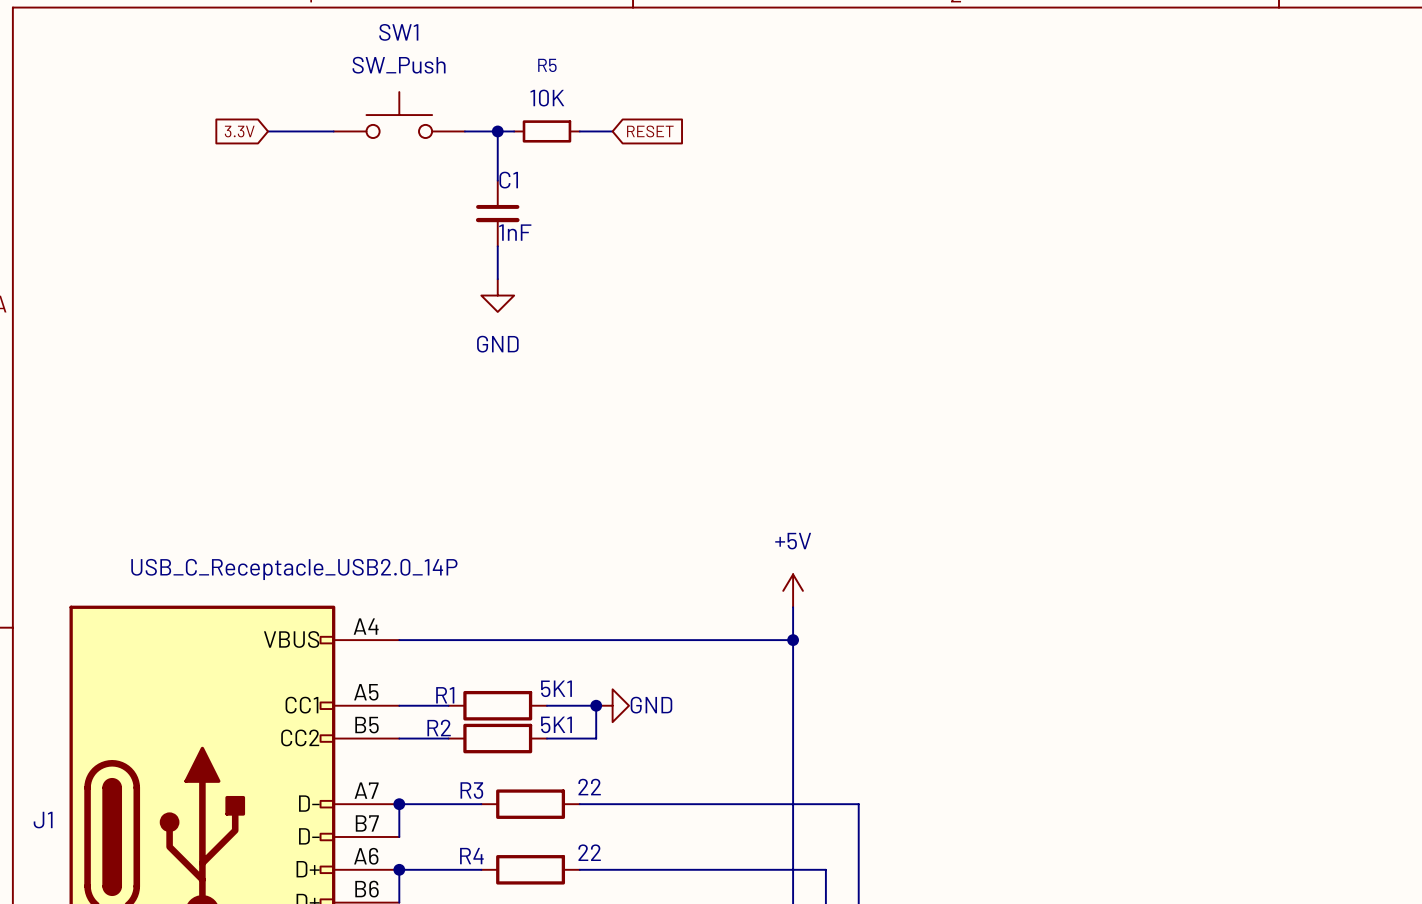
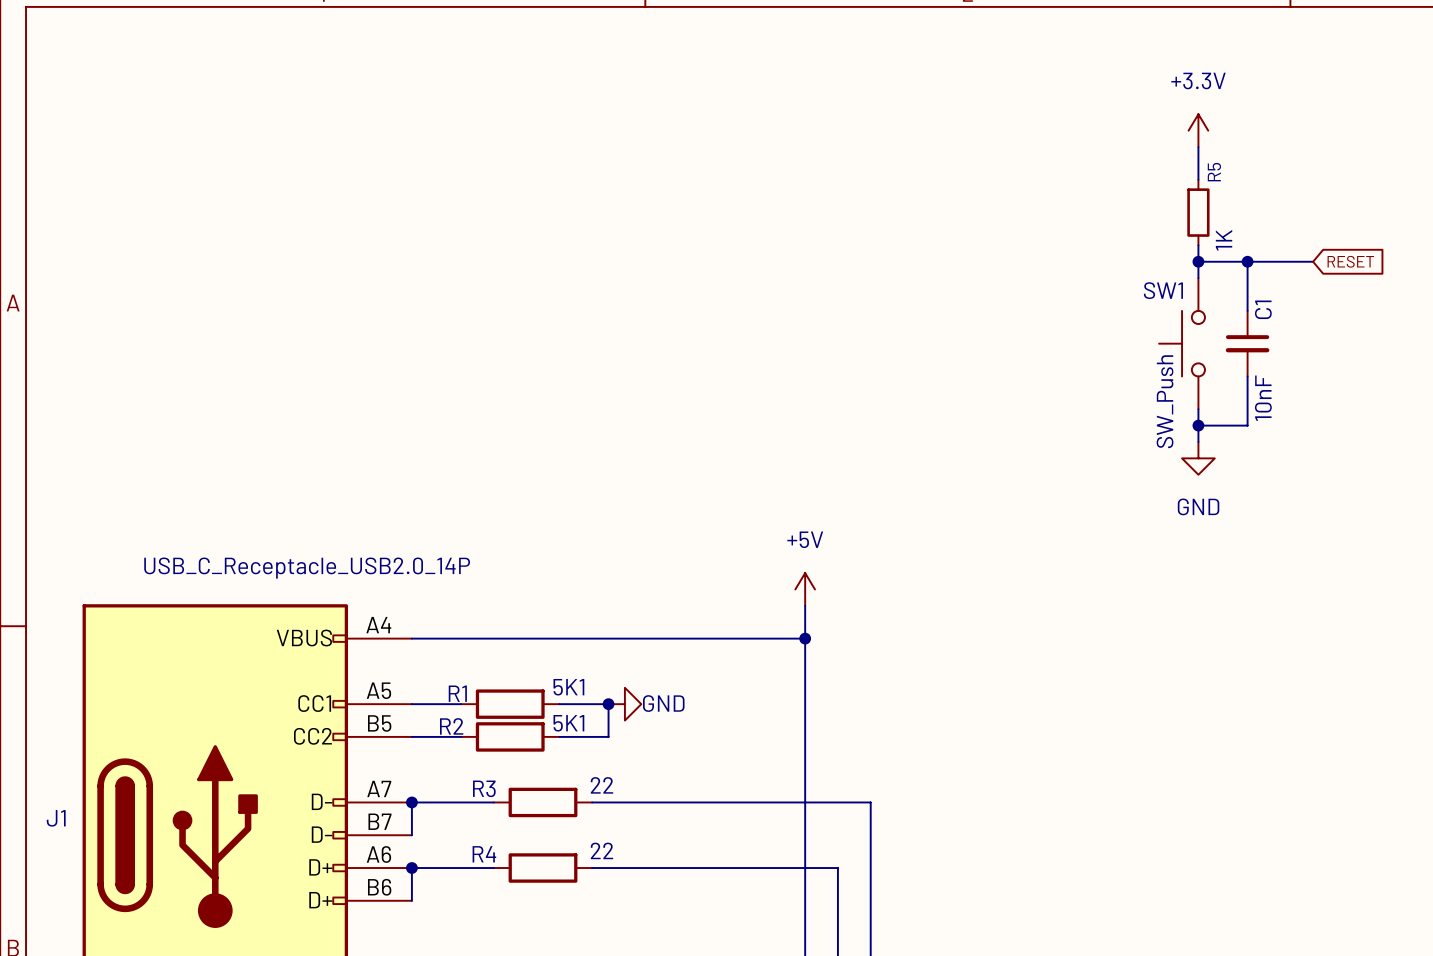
SW1 name position: SW1 (398, 32) -> SW1 (1163, 290)
SW1 value position: SW_Push (399, 65) -> SW_Push (1165, 401)
R5 value: 10K (547, 98) -> 1K (1224, 240)
SW1 rotation: 0° (399, 115) -> 90° counterclockwise (1182, 343)
SW1 position: (399, 115) -> (1182, 343)
global label: 3.3V (239, 131) -> none
wire: (268, 131) (333, 131) -> none
wire: (464, 131) (514, 131) -> none
wire: (497, 131) (497, 180) -> none
junction: (497, 131) -> none
R5 rotation: 0° (546, 131) -> 90° clockwise (1198, 212)
R5 position: (546, 131) -> (1198, 212)
wire: (579, 131) (612, 131) -> none
global label: RESET (650, 131) -> none
power symbol: none -> +3.3V (1198, 130)
wire: none -> (1198, 147) (1198, 179)
C1 name rotation: 0° (508, 180) -> 90° counterclockwise (1263, 309)
C1 position: (497, 213) -> (1247, 343)
C1 value: 1nF (515, 232) -> 10nF (1263, 398)
wire: (497, 246) (497, 279) -> none
wire: none -> (1198, 245) (1198, 278)
wire: none -> (1198, 261) (1313, 261)
junction: none -> (1198, 261)
wire: none -> (1247, 261) (1247, 310)
junction: none -> (1247, 261)
global label: none -> RESET (1350, 261)
power symbol: GND (497, 295) -> none
wire: none -> (1247, 376) (1247, 425) (1198, 425)
wire: none -> (1198, 409) (1198, 441)
junction: none -> (1198, 425)
power symbol: none -> GND (1198, 458)

